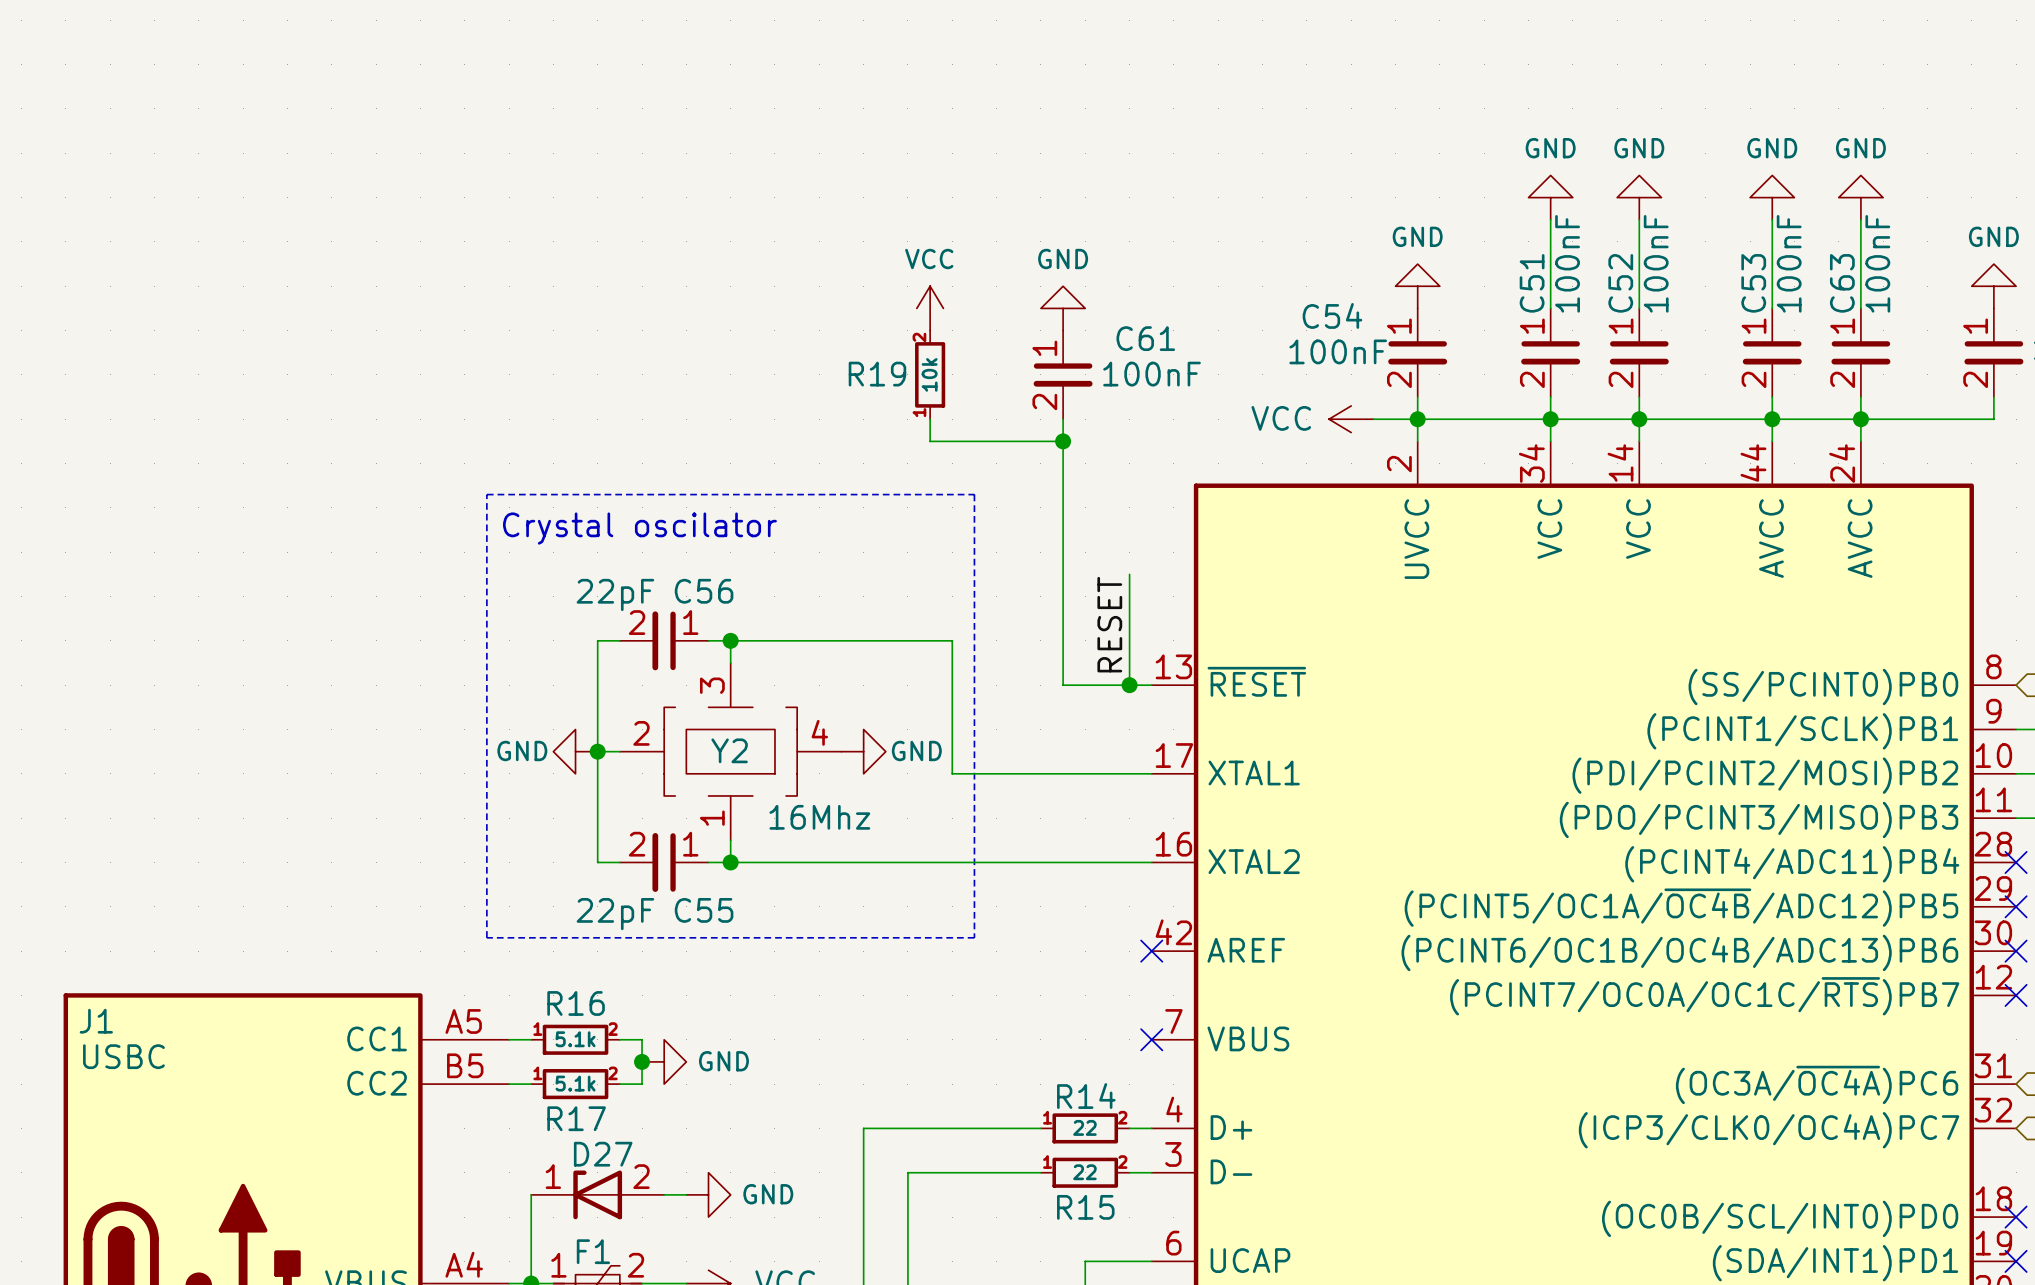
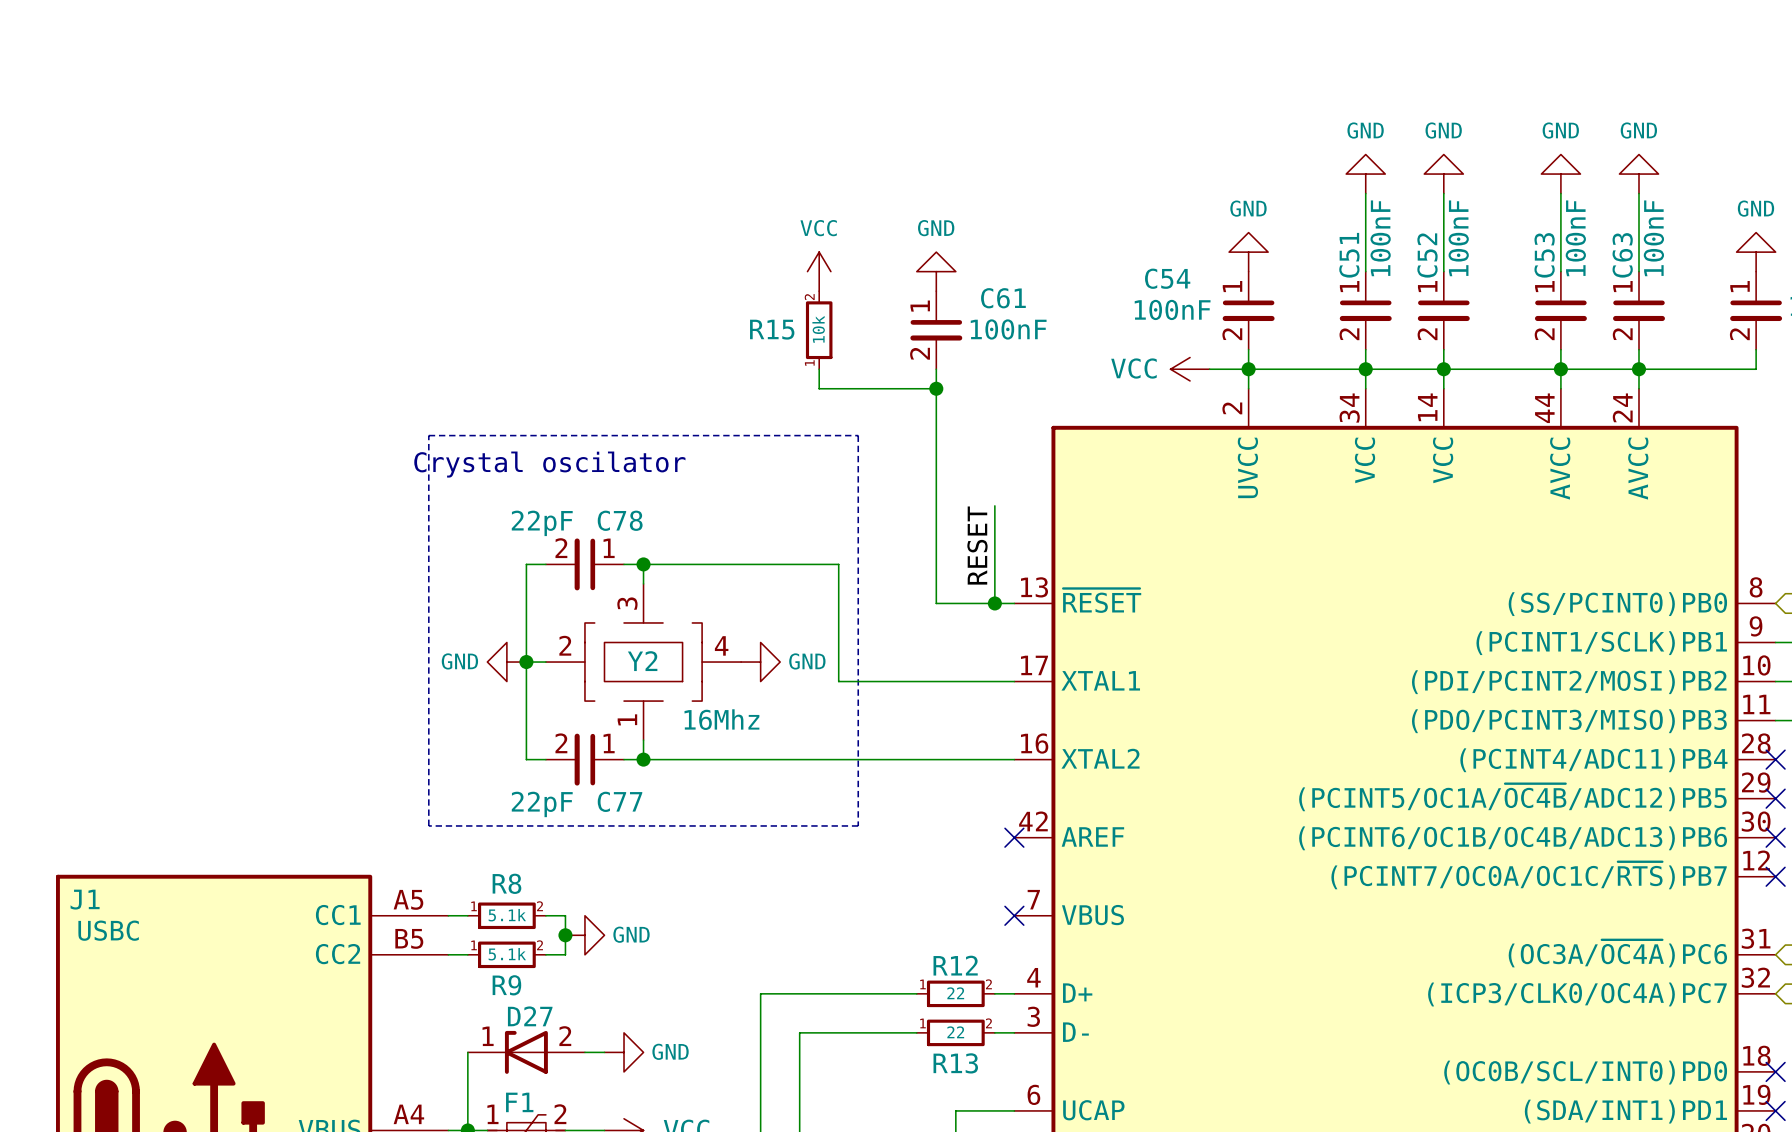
R19 name: R19 (877, 374) -> R15 (772, 329)
C56 name: C56 (704, 591) -> C78 (620, 520)
C55 name: C55 (704, 910) -> C77 (620, 801)
R16 name: R16 (576, 1003) -> R8 (506, 883)
R14 name: R14 (1086, 1096) -> R12 (955, 965)
R17 name: R17 (576, 1118) -> R9 (506, 985)
R15 name: R15 (1085, 1207) -> R13 (955, 1063)

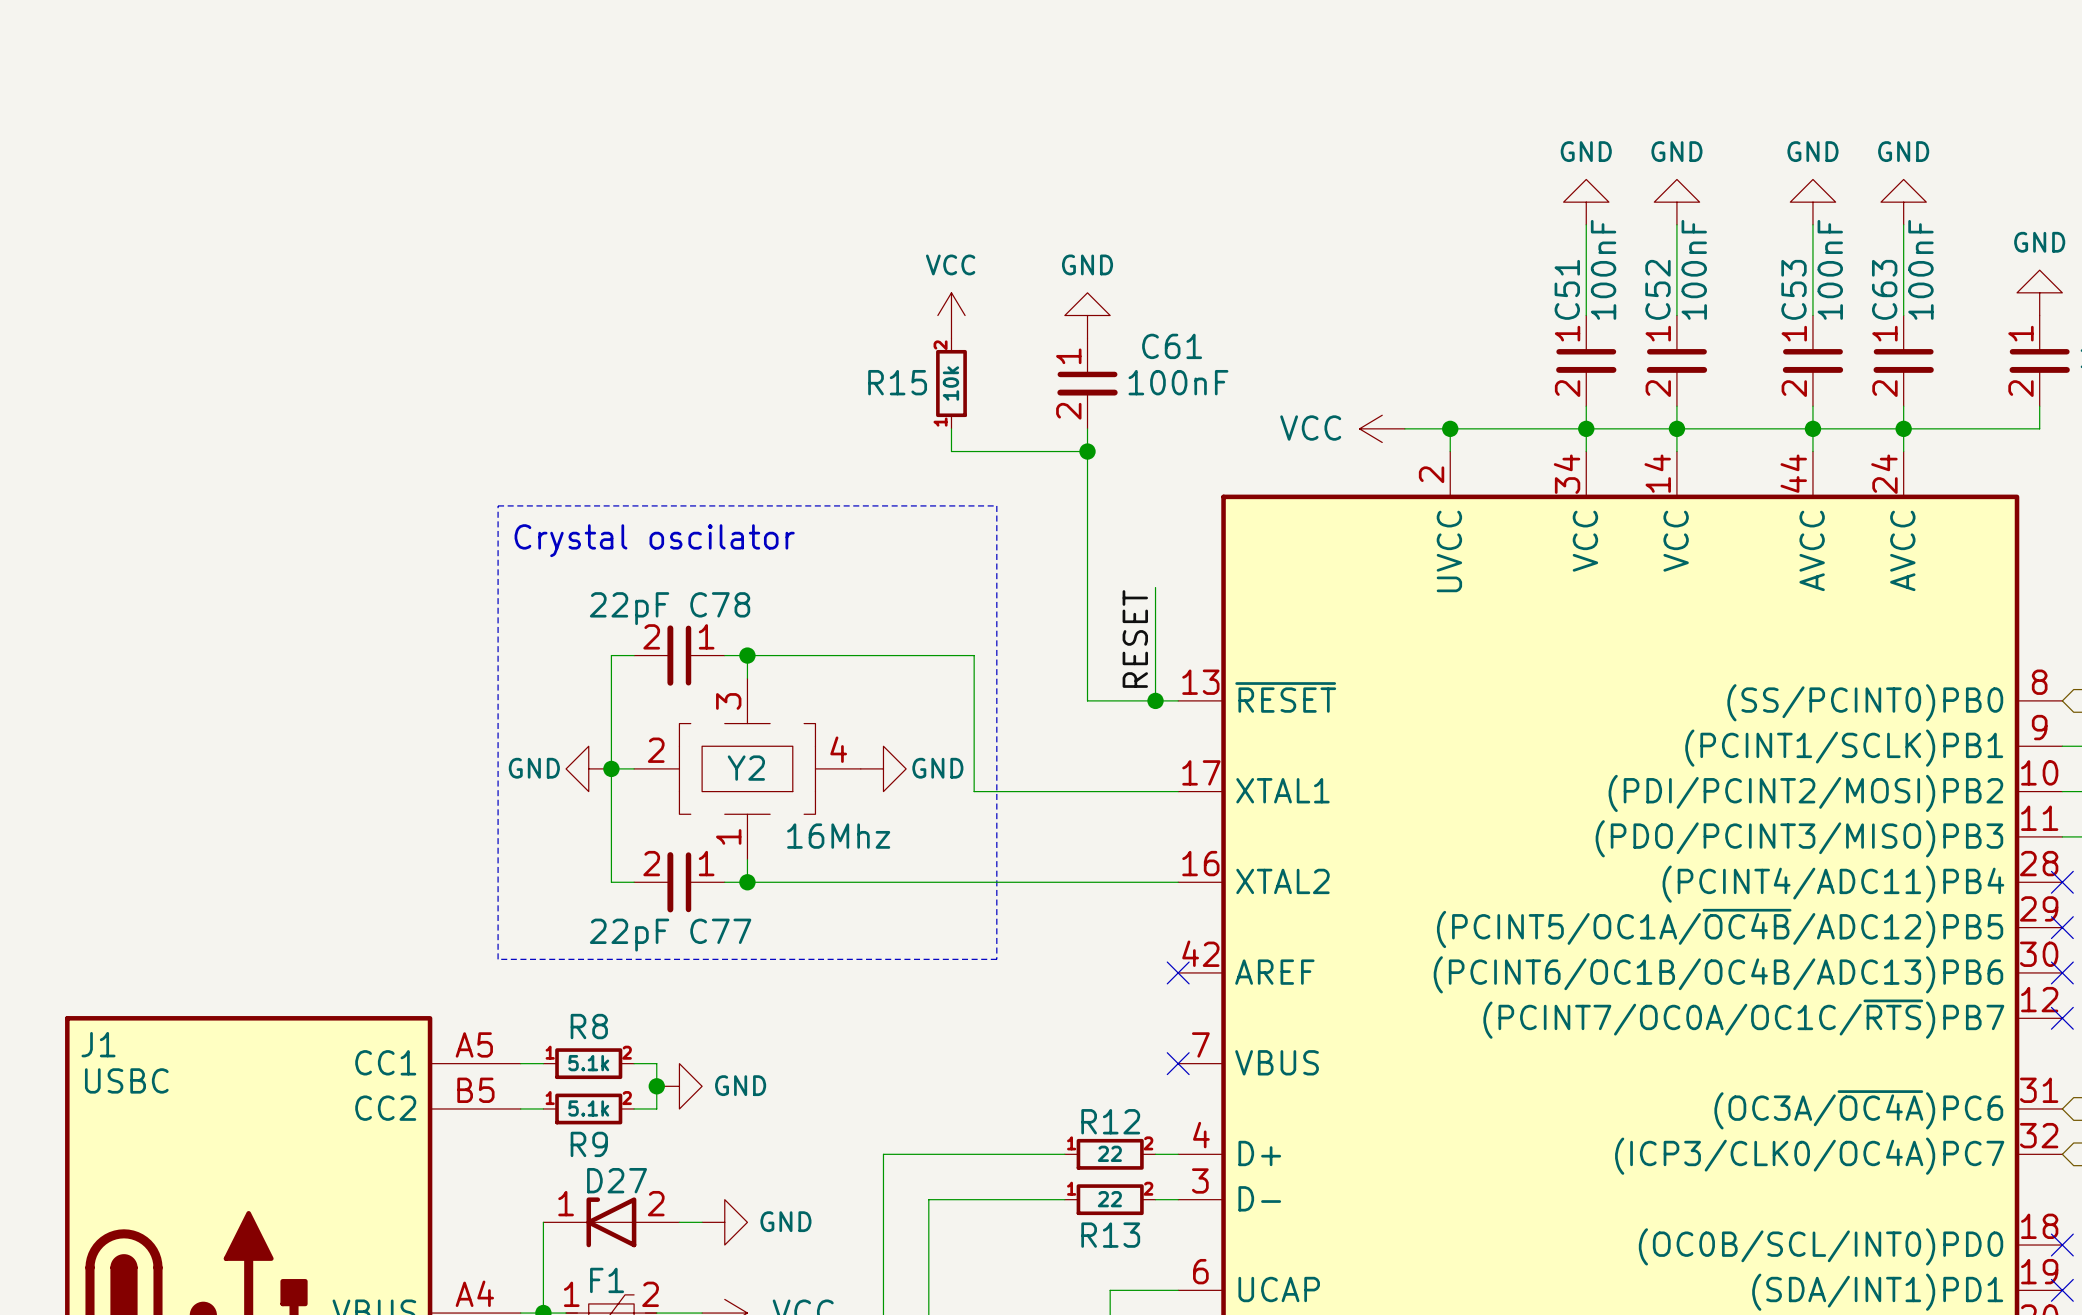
power symbol: GND (1248, 252) -> none
C54: 100nF (1248, 310) -> none
wire: (1248, 349) (1248, 369) -> none

